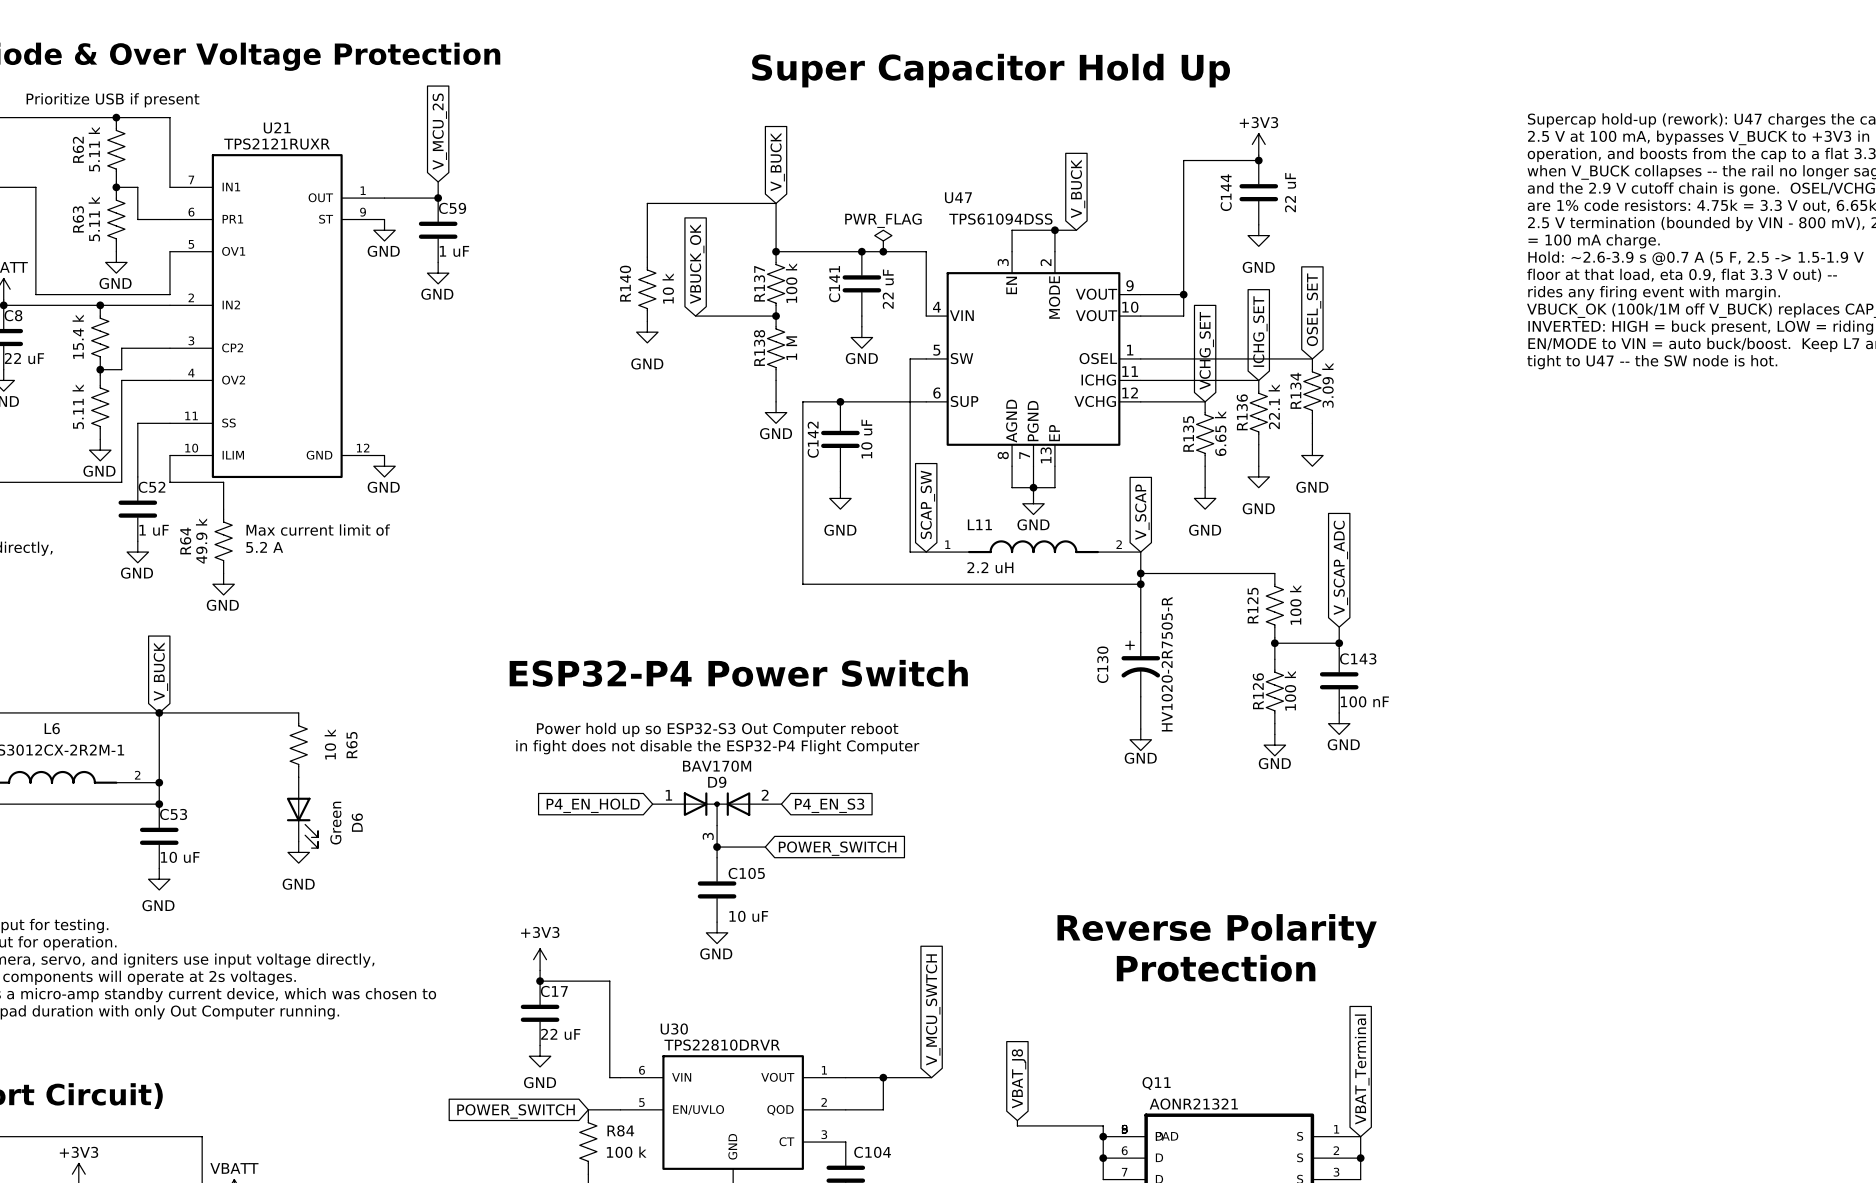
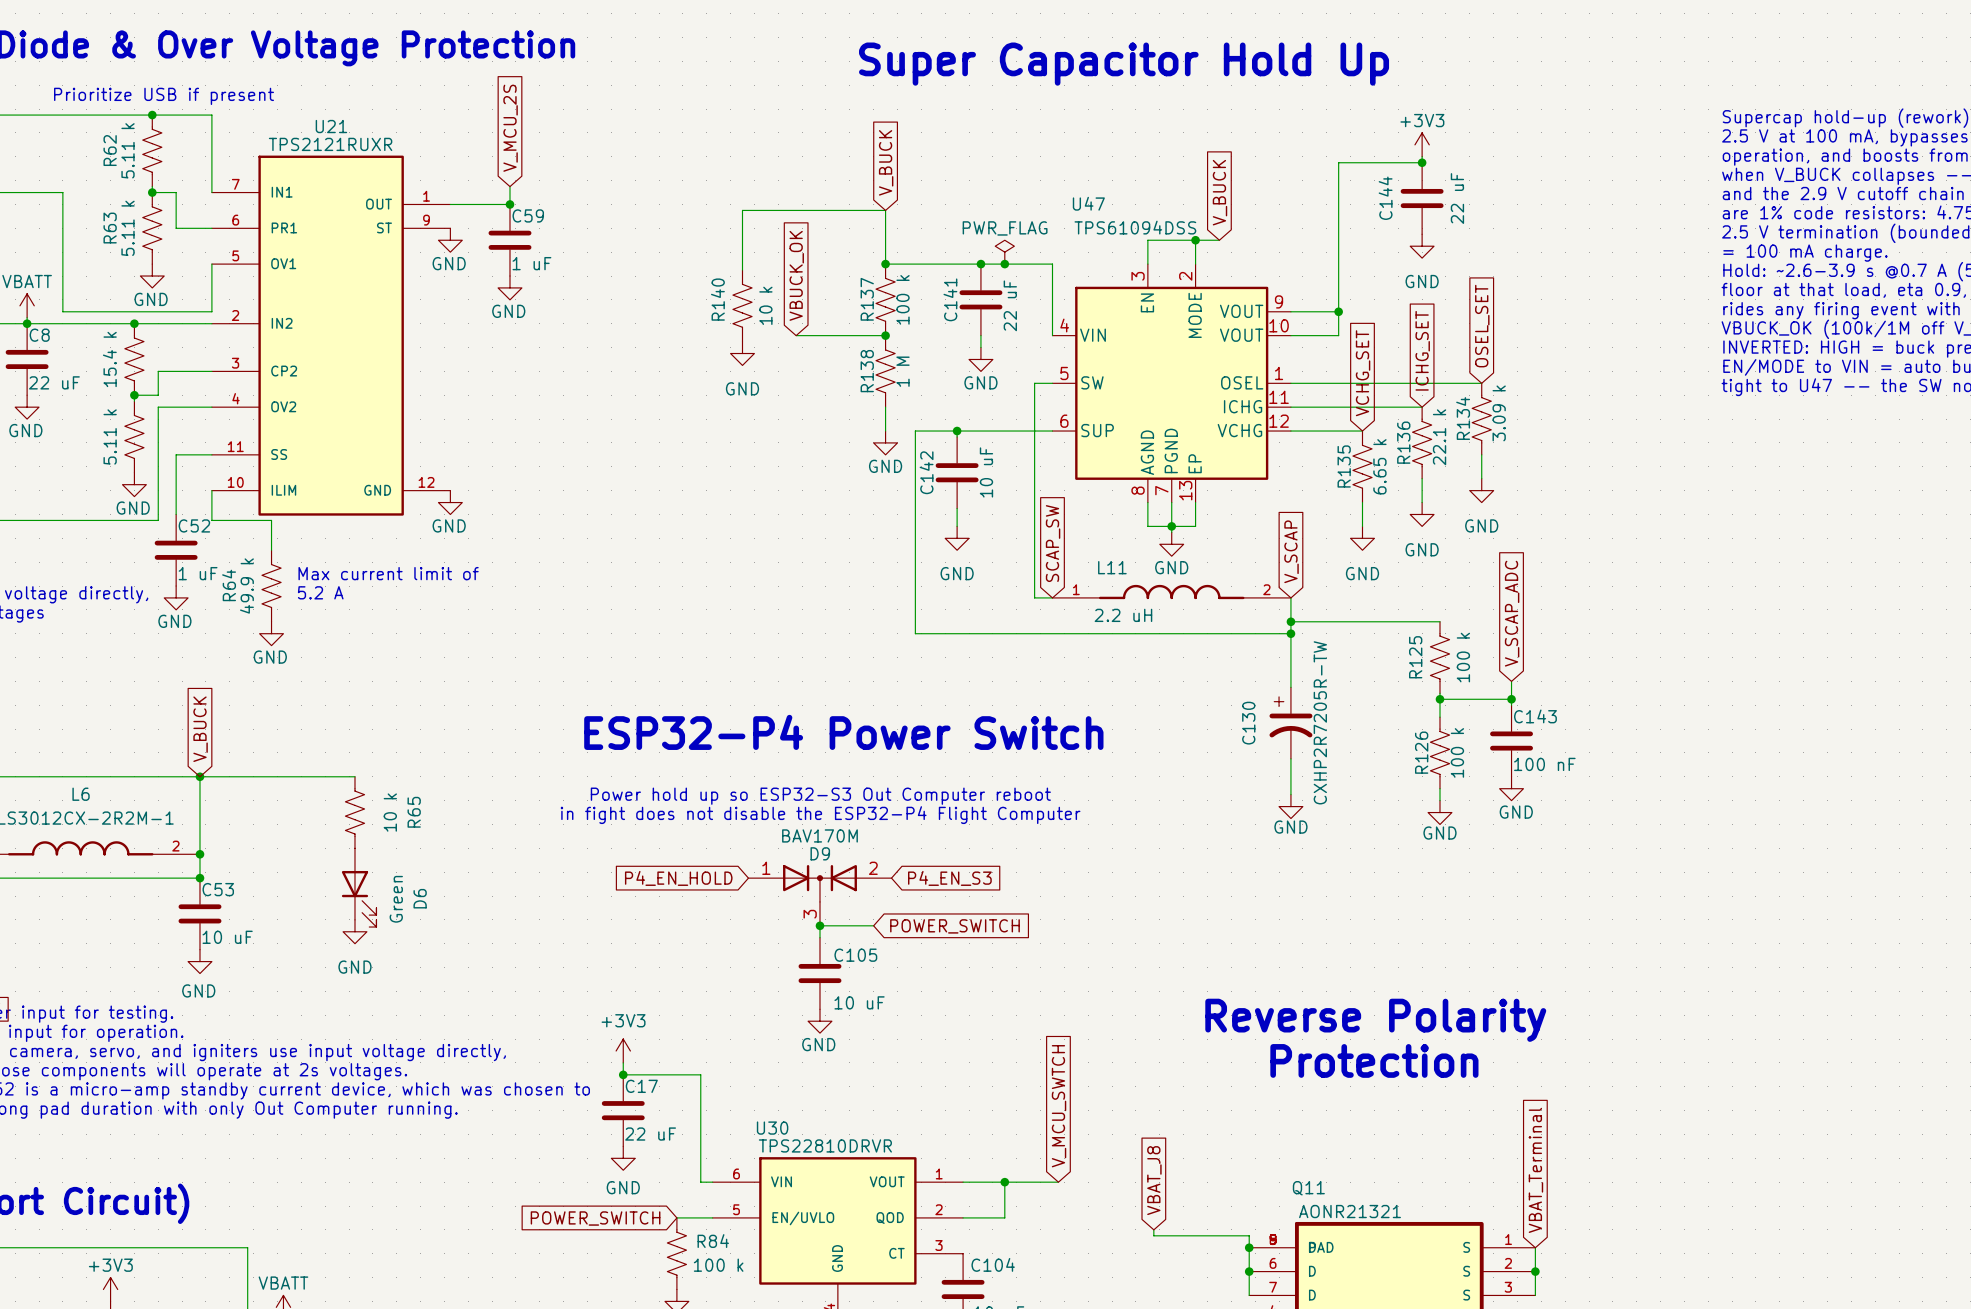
C130 value: HV1020-2R7505-R (1167, 664) -> CXHP2R7205R-TW (1320, 722)

